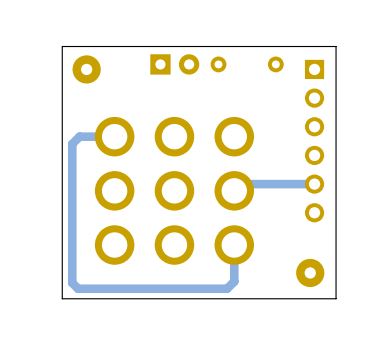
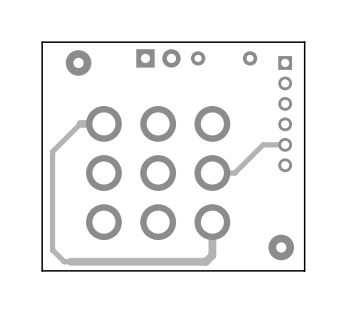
board edge: (62, 46) (62, 298) -> (56, 42) (42, 42) (42, 270) (56, 270)
part: none -> (285, 114)
track: (88, 136) (79, 136) (72, 143) (72, 283) (78, 288) -> (80, 123) (52, 151) (52, 250) (64, 261) (70, 261)
part: (314, 141) -> none
track: (314, 184) (241, 184) (234, 190) -> (285, 144) (263, 144) (234, 173) (212, 173)

